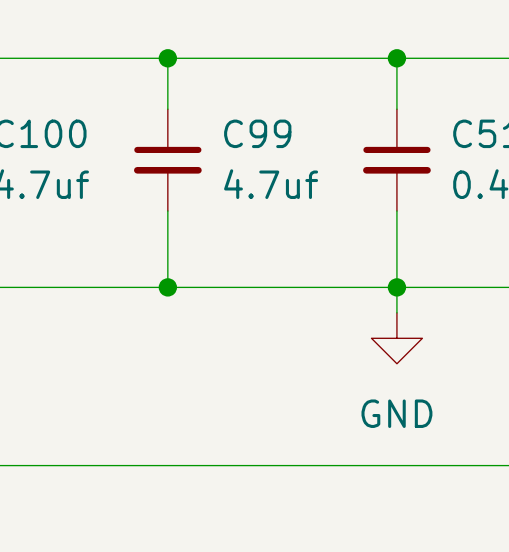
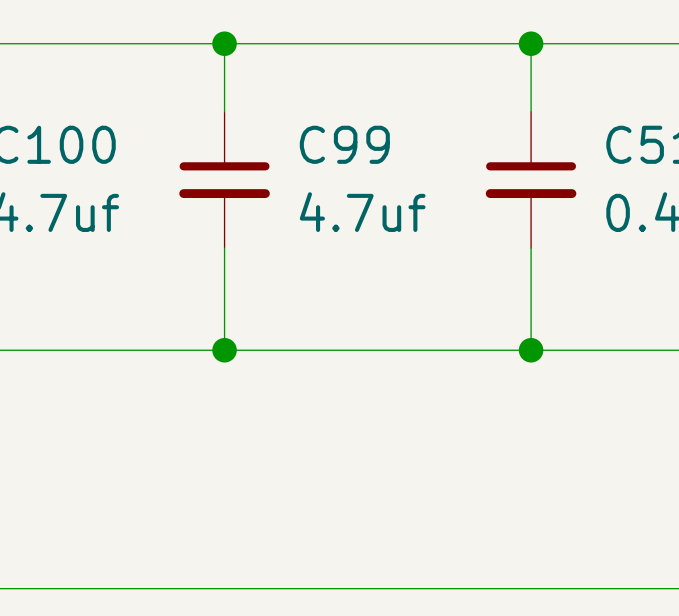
wire: (396, 287) (396, 312) -> none
power symbol: GND (396, 338) -> none

